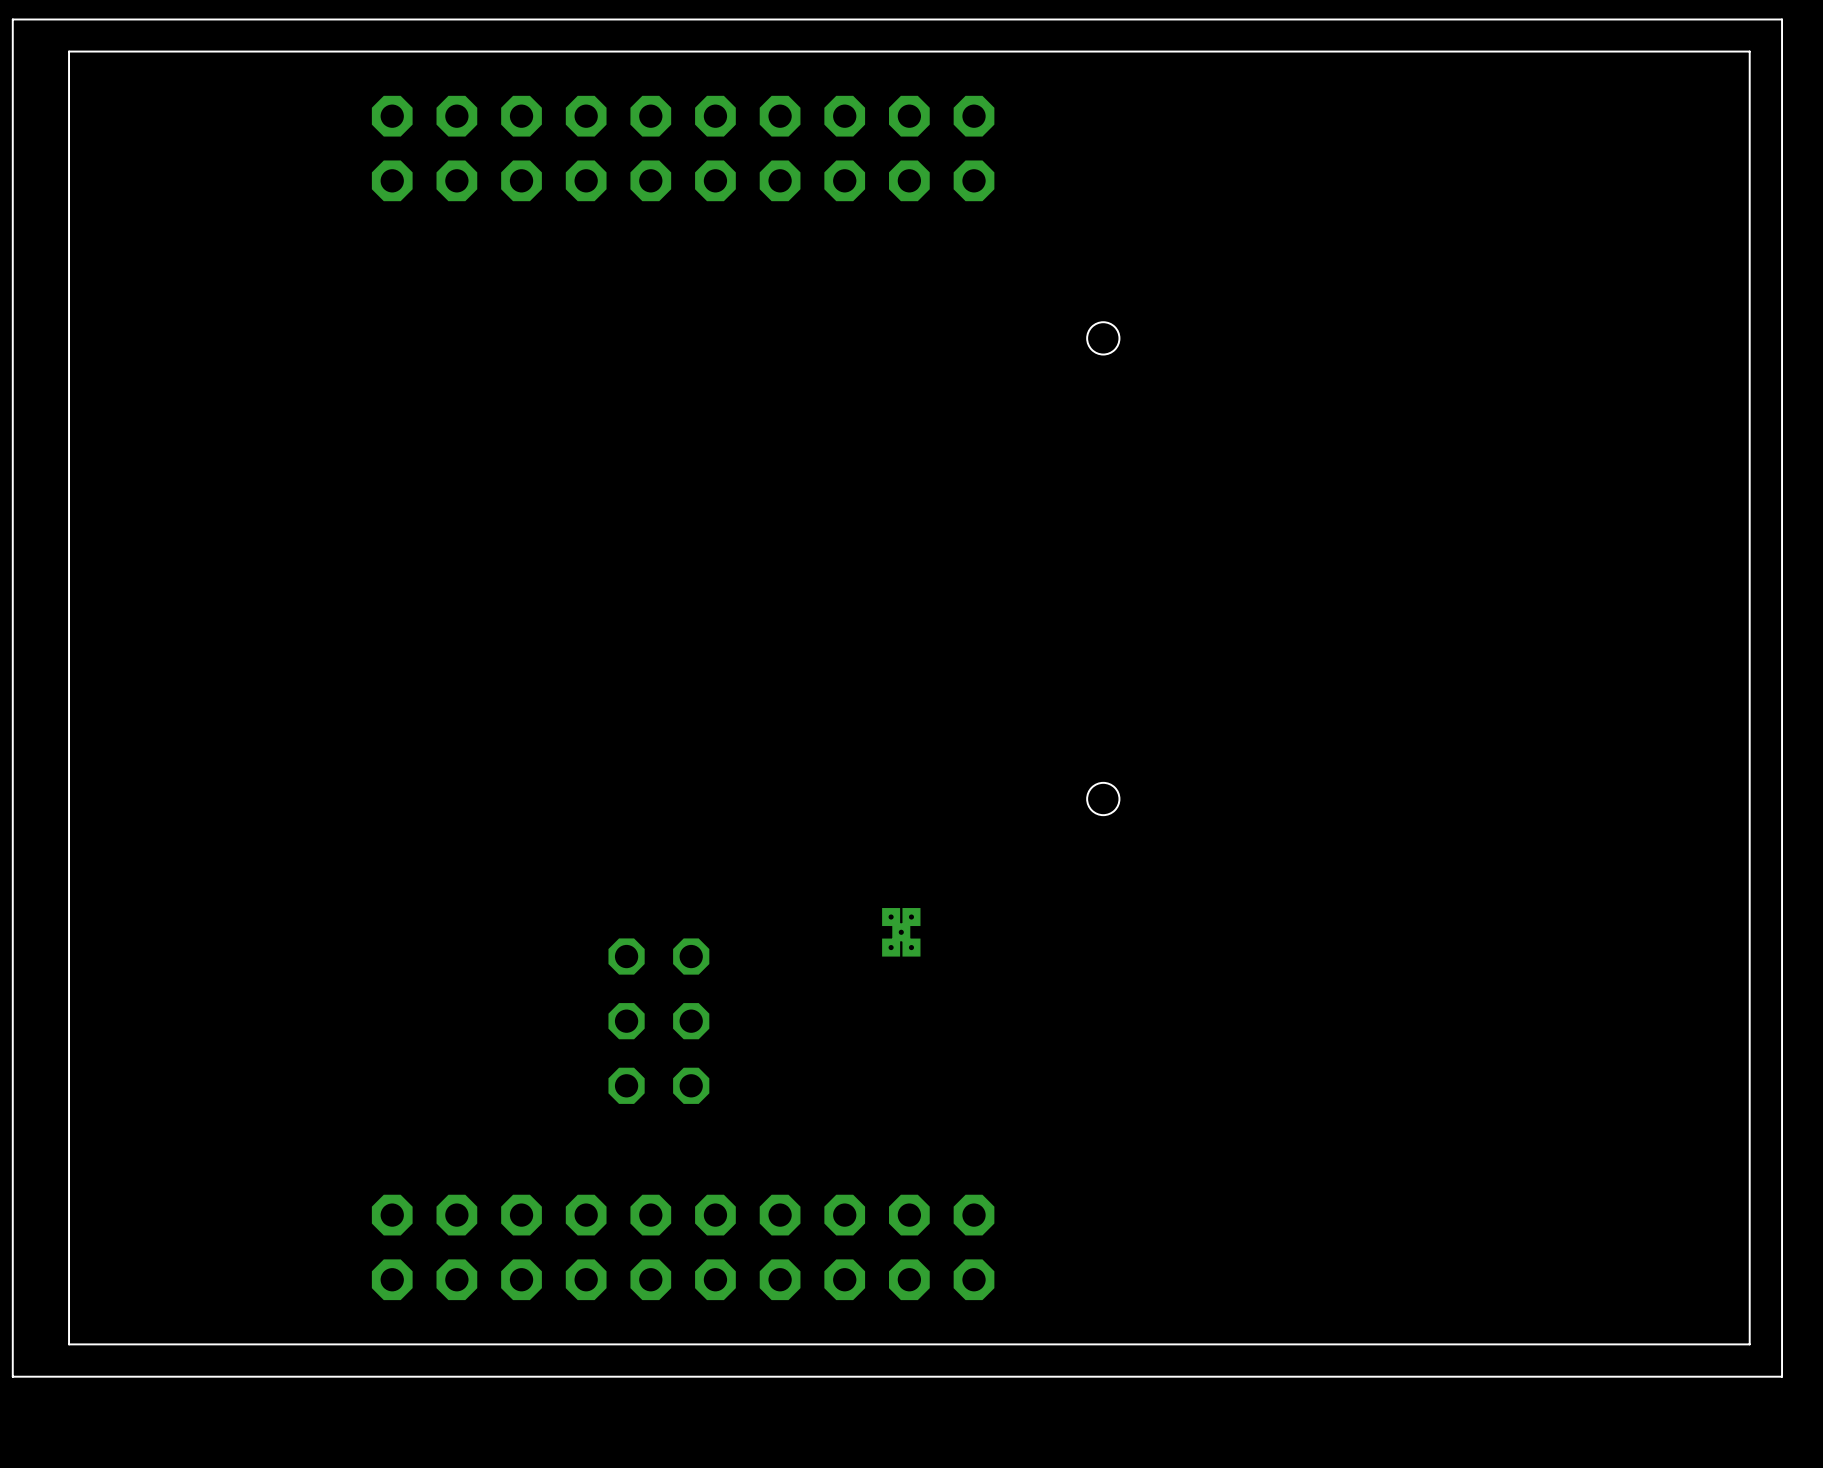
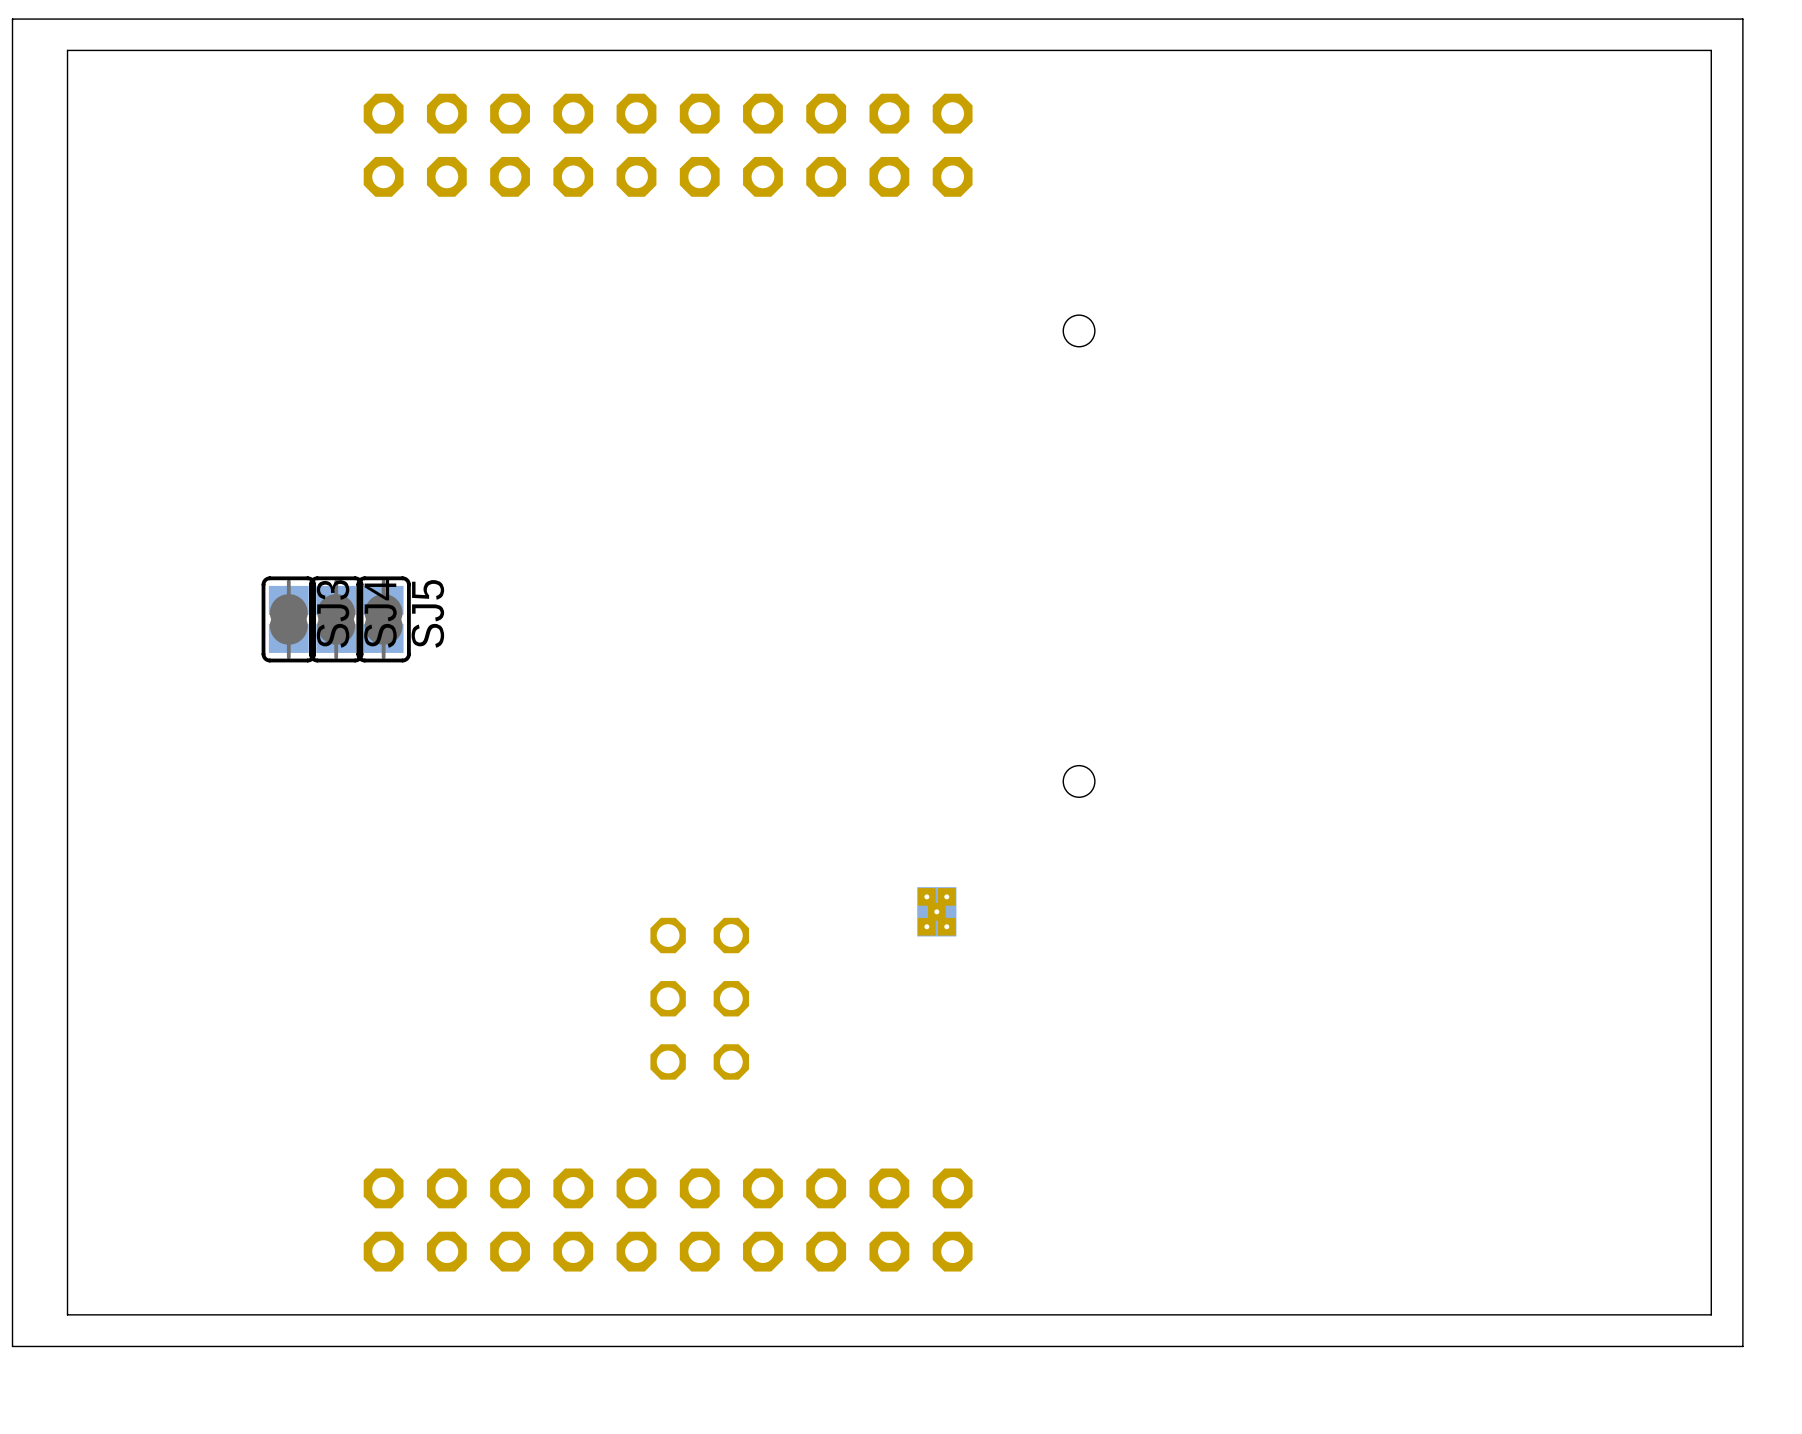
SJ3: none -> (288, 619)
SJ4: none -> (336, 619)
SJ5: none -> (383, 619)
part: (901, 932) -> none
part: none -> (936, 911)
part position: (658, 1021) -> (699, 998)

